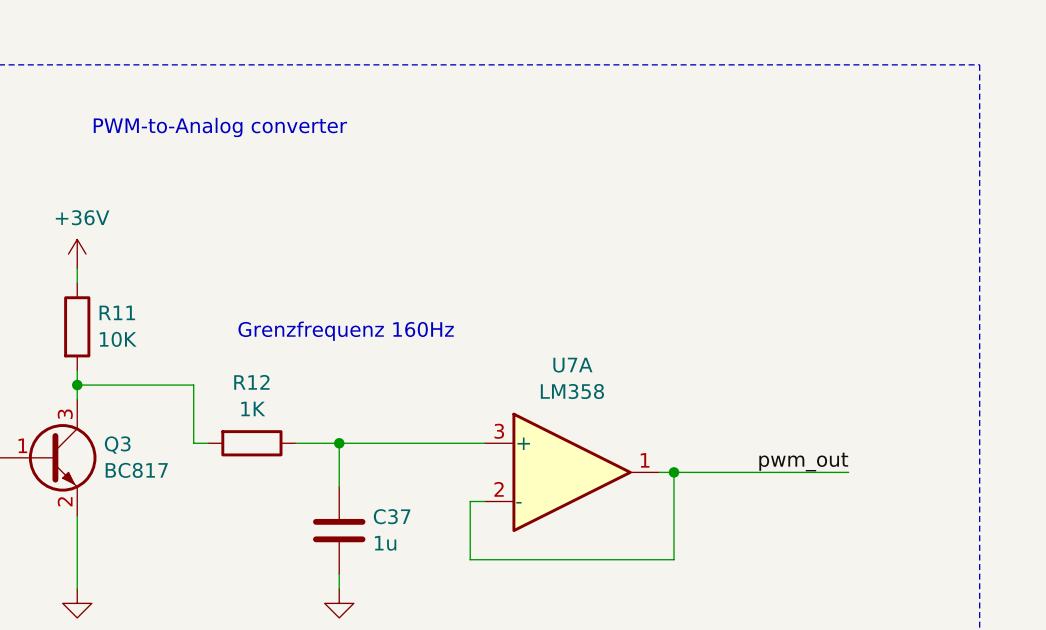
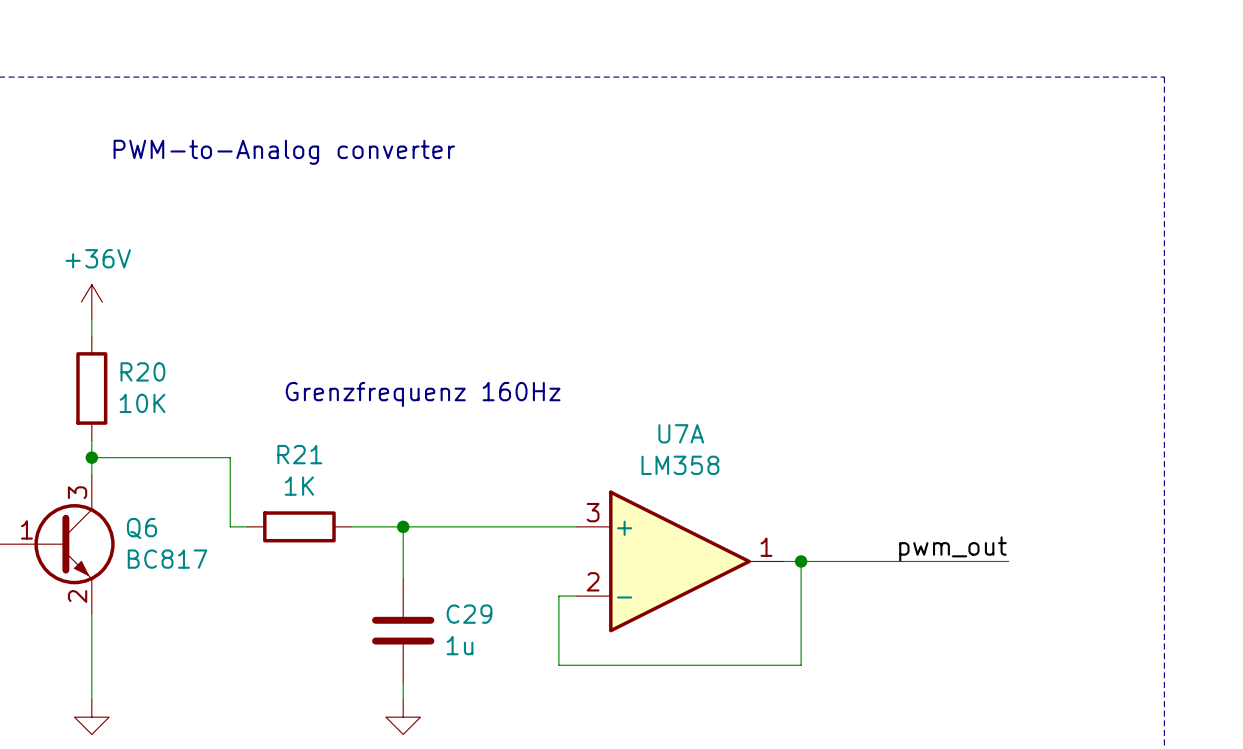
R11 name: R11 (117, 312) -> R20 (142, 371)
R12 name: R12 (251, 382) -> R21 (299, 454)
Q3 name: Q3 (117, 445) -> Q6 (141, 528)
C37 name: C37 (392, 516) -> C29 (469, 614)

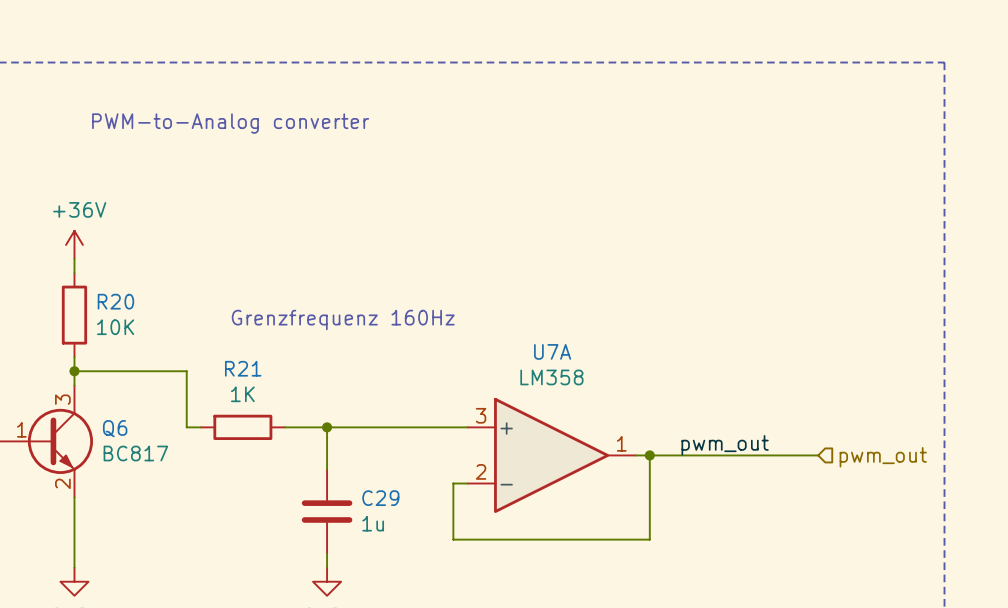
label position: pwm_out (952, 548) -> pwm_out (725, 445)
hierarchical label: none -> pwm_out (883, 457)

